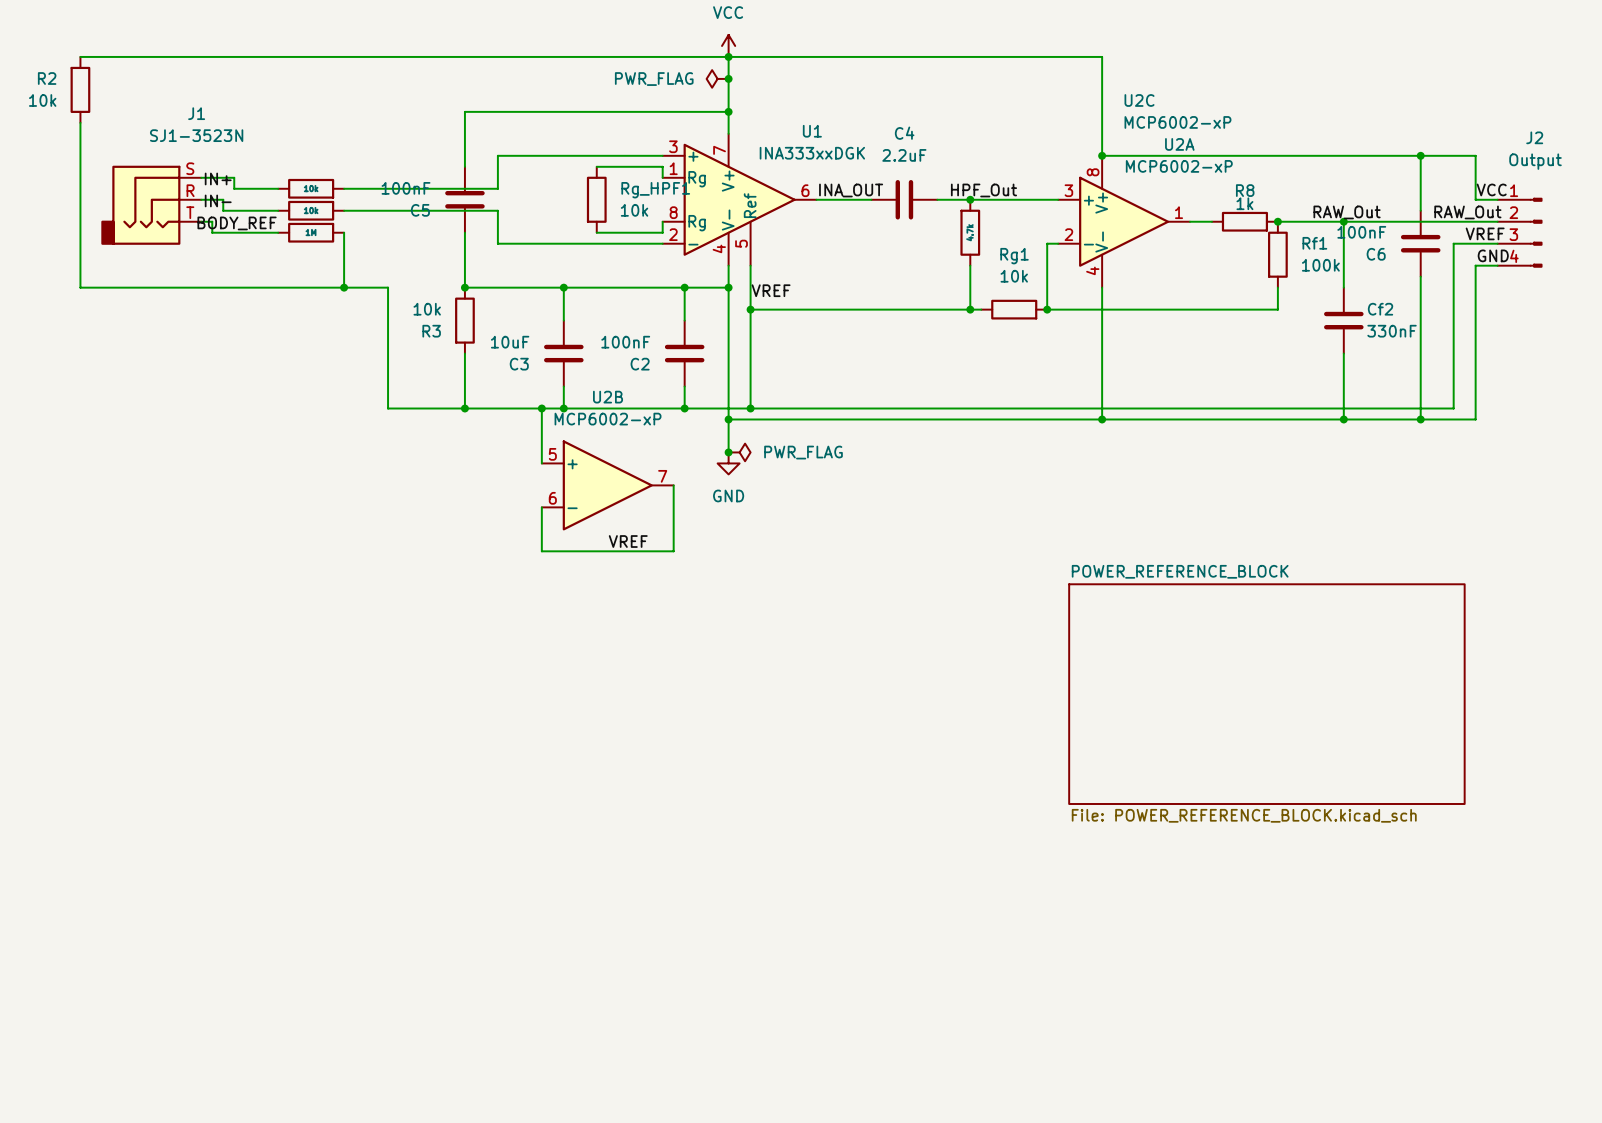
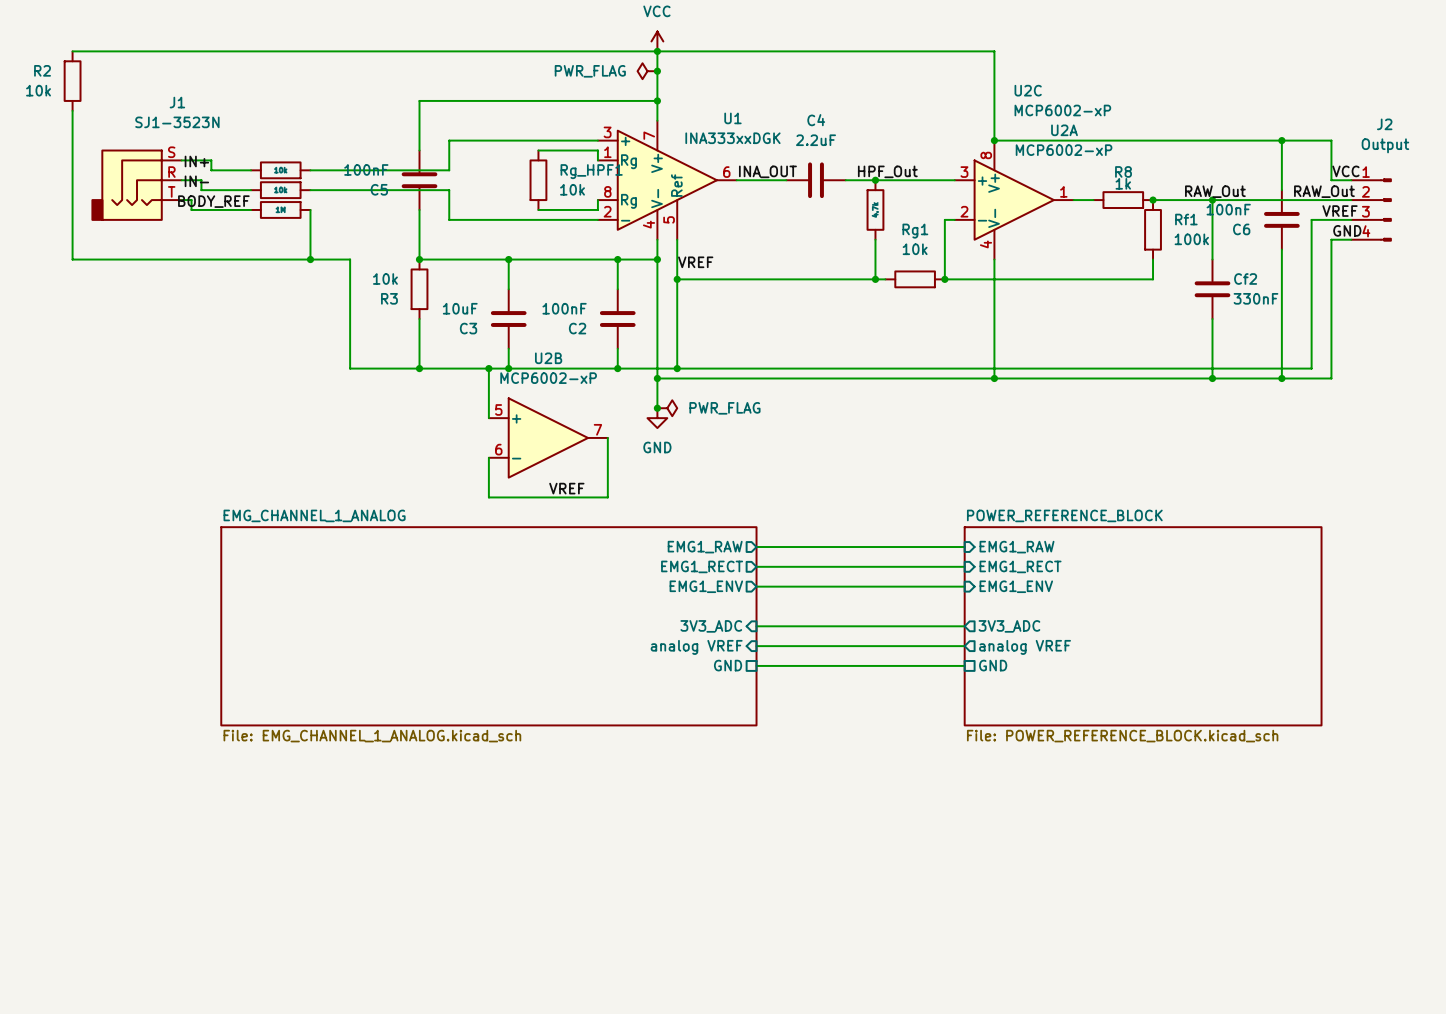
sheet pin: none -> EMG1_RAW (705, 547)
wire: none -> (756, 547) (964, 547)
sheet pin: none -> EMG1_RAW (1016, 547)
sheet pin: none -> EMG1_RECT (702, 566)
wire: none -> (756, 566) (964, 566)
sheet pin: none -> EMG1_RECT (1020, 566)
sheet pin: none -> EMG1_ENV (706, 586)
wire: none -> (756, 586) (964, 586)
sheet pin: none -> EMG1_ENV (1016, 586)
sheet EMG_CHANNEL_1_ANALOG: none -> File: EMG_CHANNEL_1_ANALOG.kicad_sch (488, 626)
sheet pin: none -> 3V3_ADC (711, 626)
wire: none -> (756, 626) (964, 626)
sheet pin: none -> 3V3_ADC (1009, 626)
wire: none -> (756, 646) (964, 646)
sheet pin: none -> analog VREF (696, 647)
sheet pin: none -> analog VREF (1025, 647)
sheet pin: none -> GND (728, 665)
sheet pin: none -> GND (993, 665)
wire: none -> (756, 665) (964, 665)

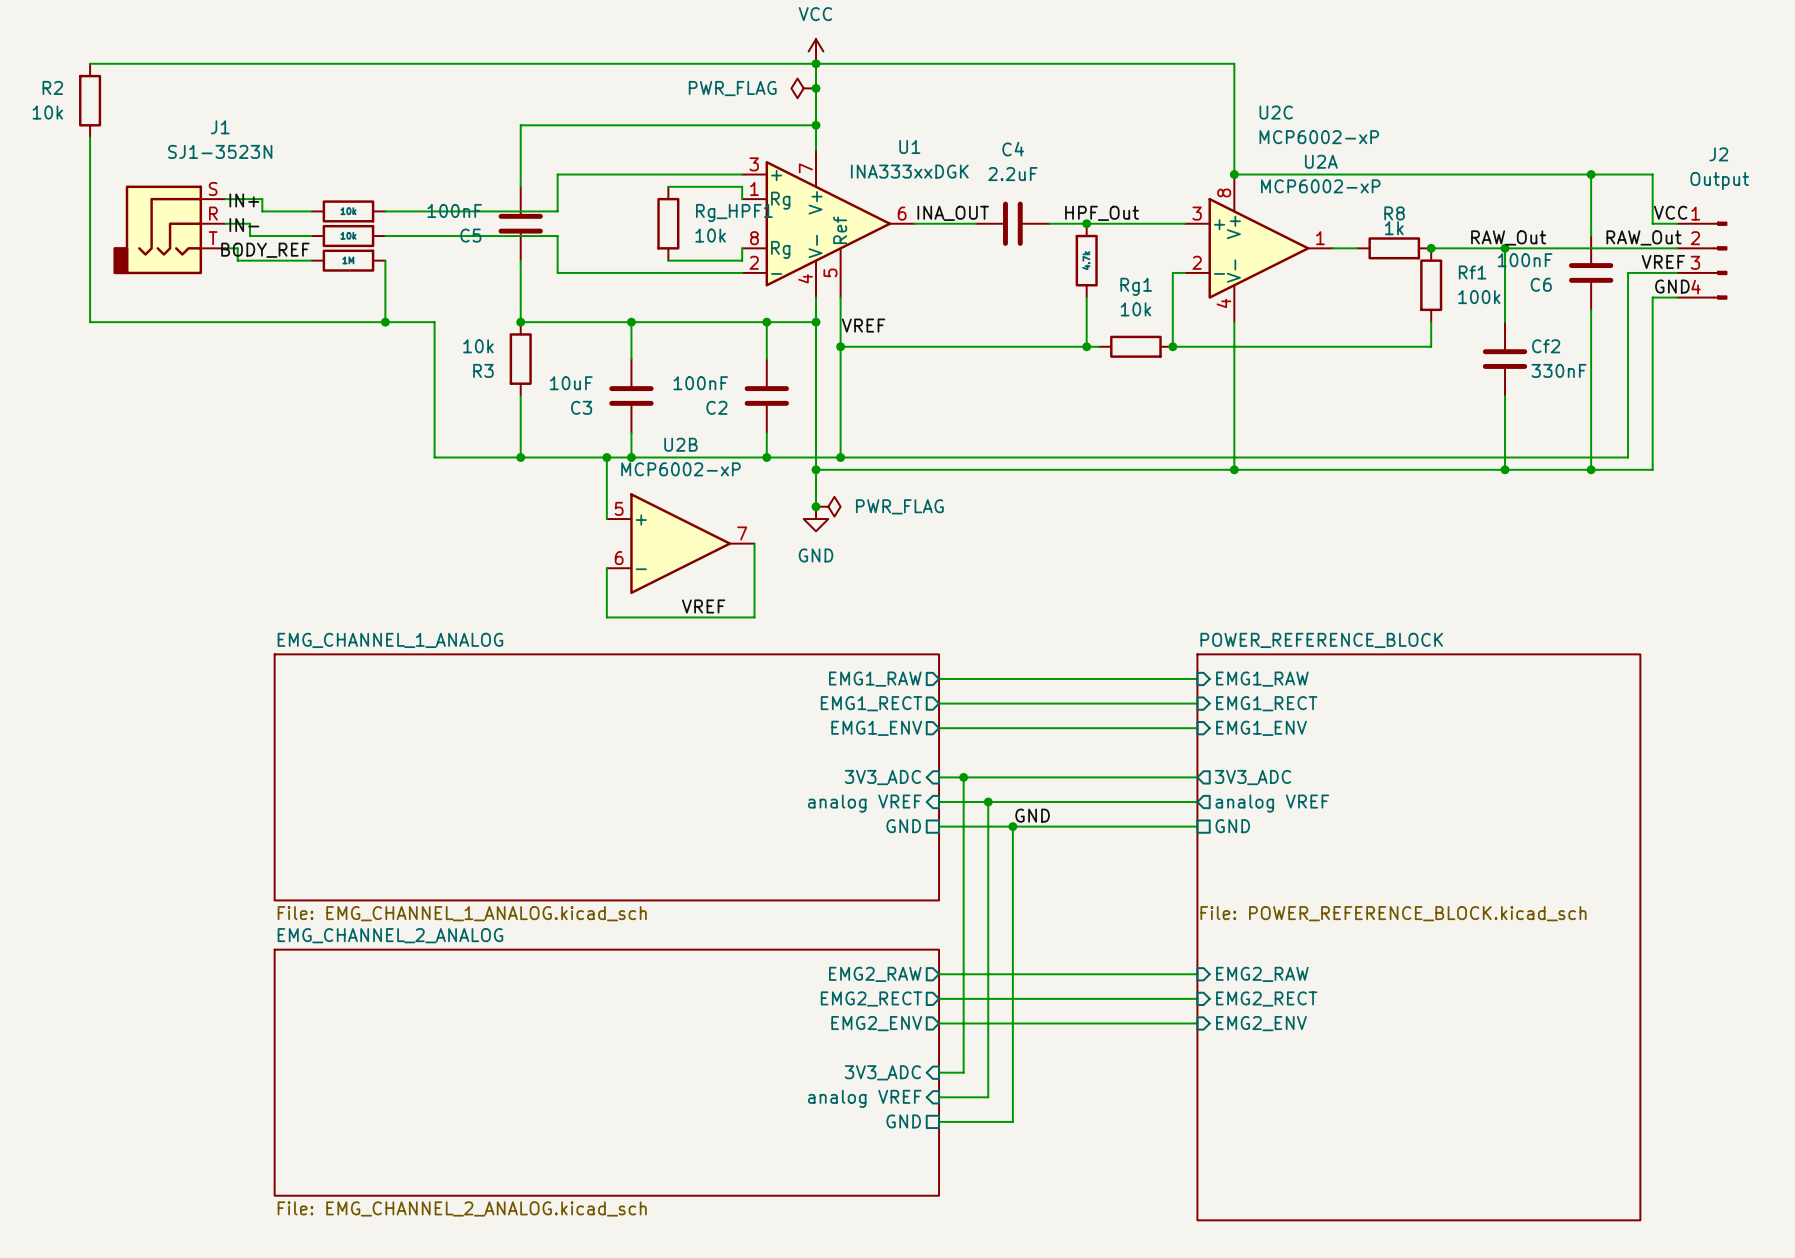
wire: none -> (963, 777) (963, 1072) (939, 1072)
junction: none -> (963, 777)
sheet POWER_REFERENCE_BLOCK: File: POWER_REFERENCE_BLOCK.kicad_sch (1143, 626) -> none
wire: none -> (988, 802) (988, 1097) (939, 1097)
junction: none -> (988, 802)
label: none -> GND (1032, 815)
wire: none -> (1012, 826) (1012, 1121) (939, 1121)
junction: none -> (1012, 826)
sheet POWER_REFERENCE_BLOCK: none -> File: POWER_REFERENCE_BLOCK.kicad_sch (1418, 937)
wire: none -> (939, 974) (1197, 974)
sheet pin: none -> EMG2_RAW (875, 974)
sheet pin: none -> EMG2_RAW (1262, 974)
sheet pin: none -> EMG2_RECT (871, 998)
wire: none -> (939, 998) (1197, 998)
sheet pin: none -> EMG2_RECT (1266, 998)
sheet pin: none -> EMG2_ENV (876, 1023)
wire: none -> (939, 1023) (1197, 1023)
sheet pin: none -> EMG2_ENV (1261, 1023)
sheet EMG_CHANNEL_2_ANALOG: none -> File: EMG_CHANNEL_2_ANALOG.kicad_sch (606, 1072)
sheet pin: none -> 3V3_ADC (882, 1072)
sheet pin: none -> analog VREF (864, 1098)
sheet pin: none -> GND (903, 1121)

